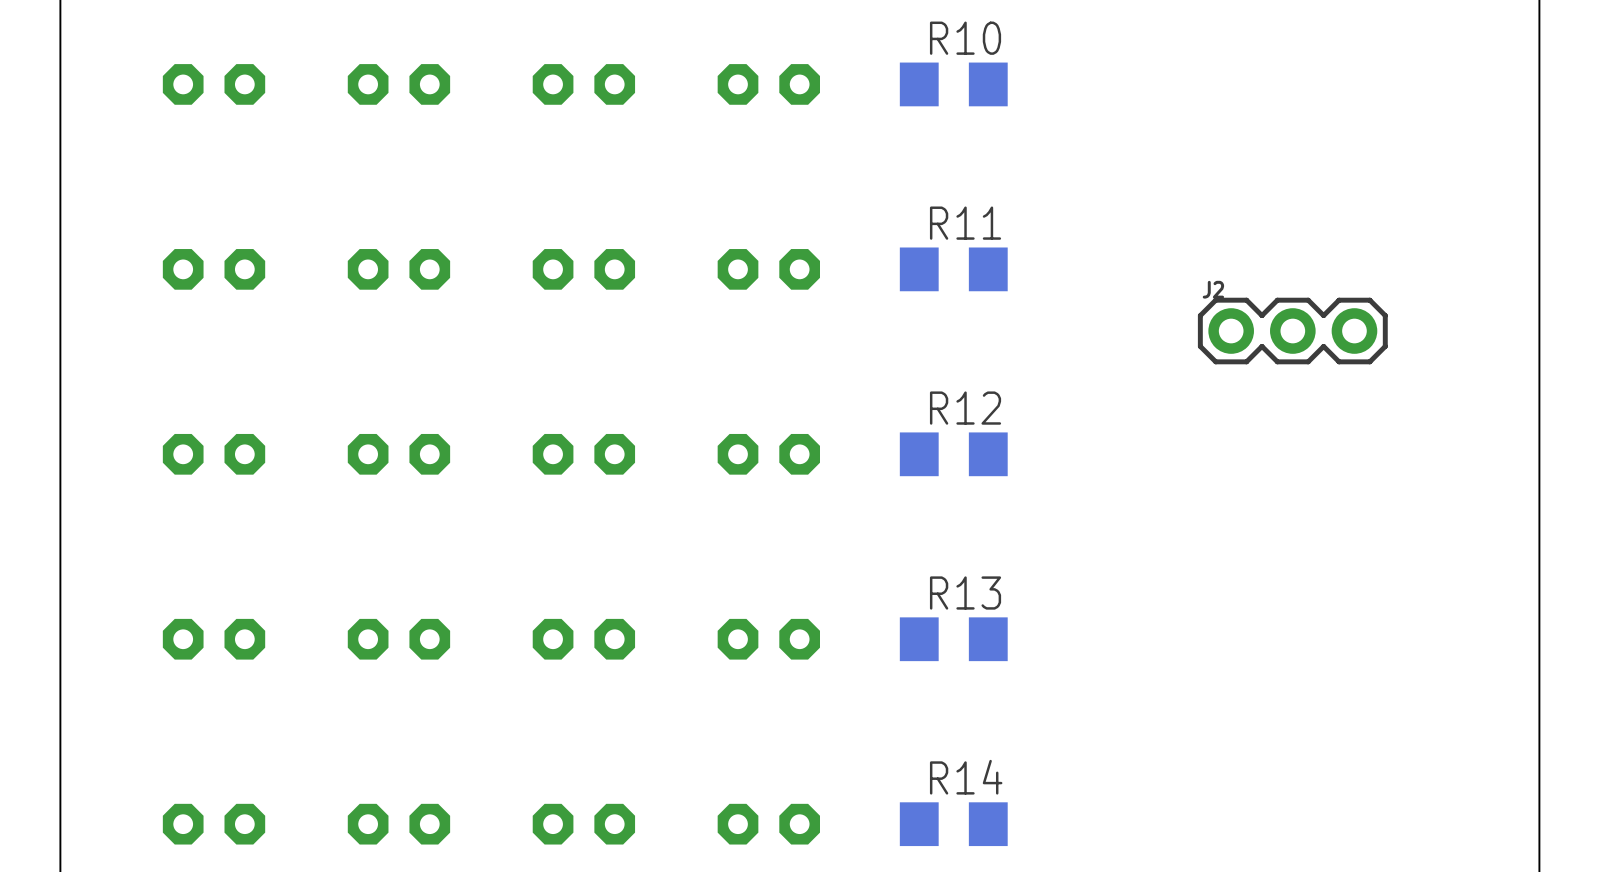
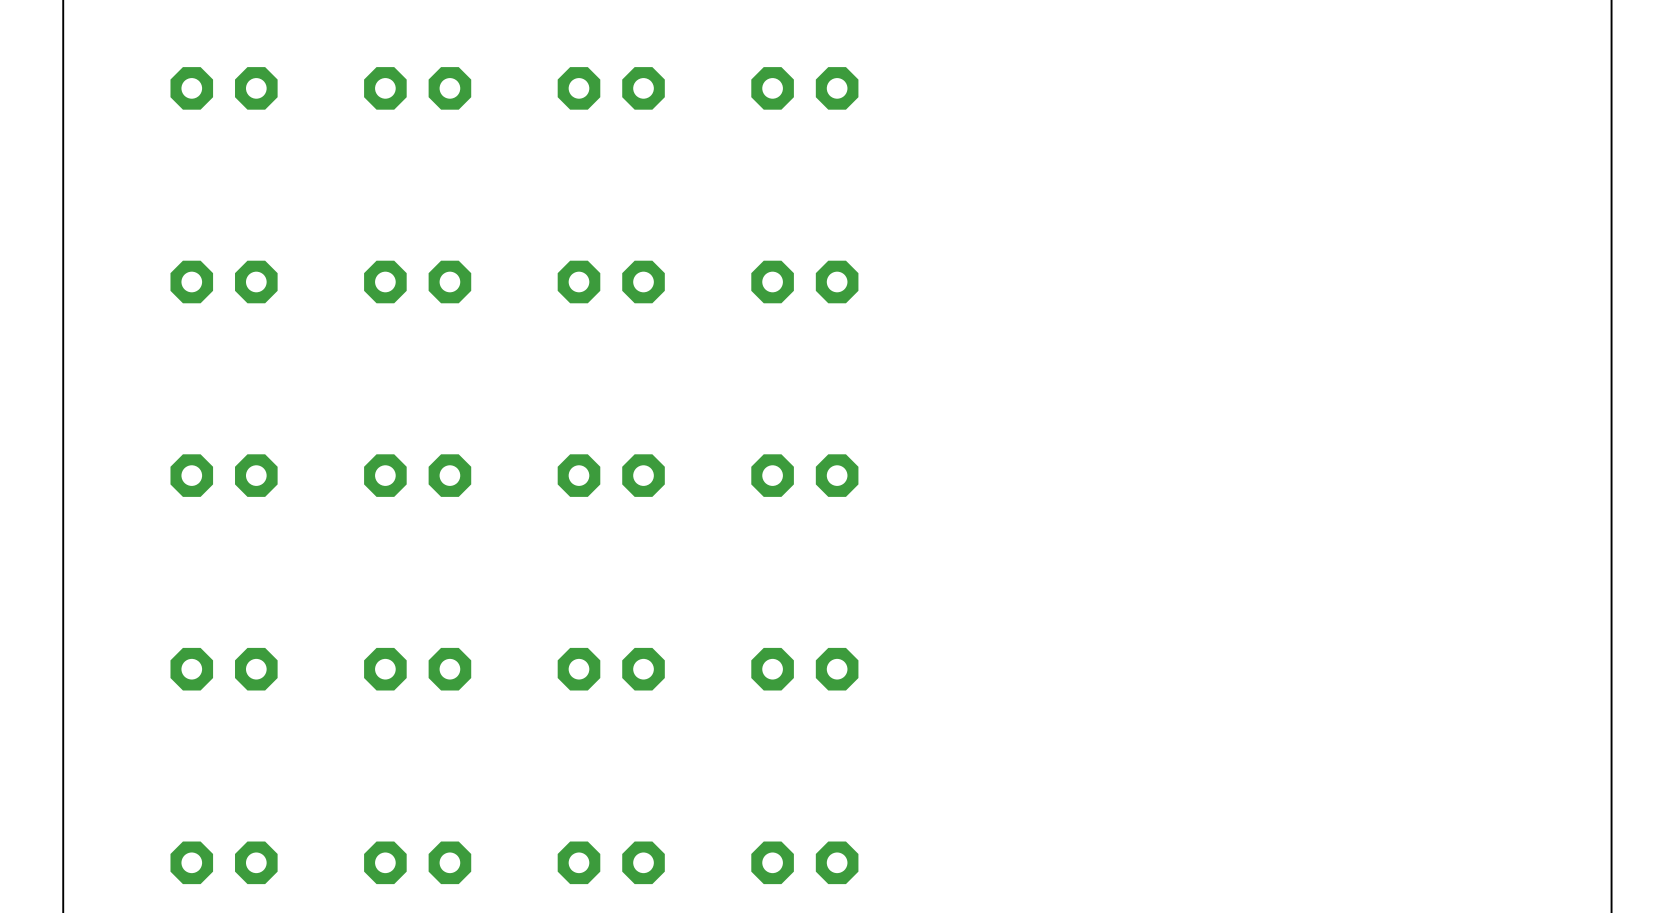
R10: (953, 84) -> none
R11: (953, 269) -> none
J2: (1292, 331) -> none
R12: (953, 454) -> none
R13: (953, 639) -> none
R14: (953, 824) -> none

